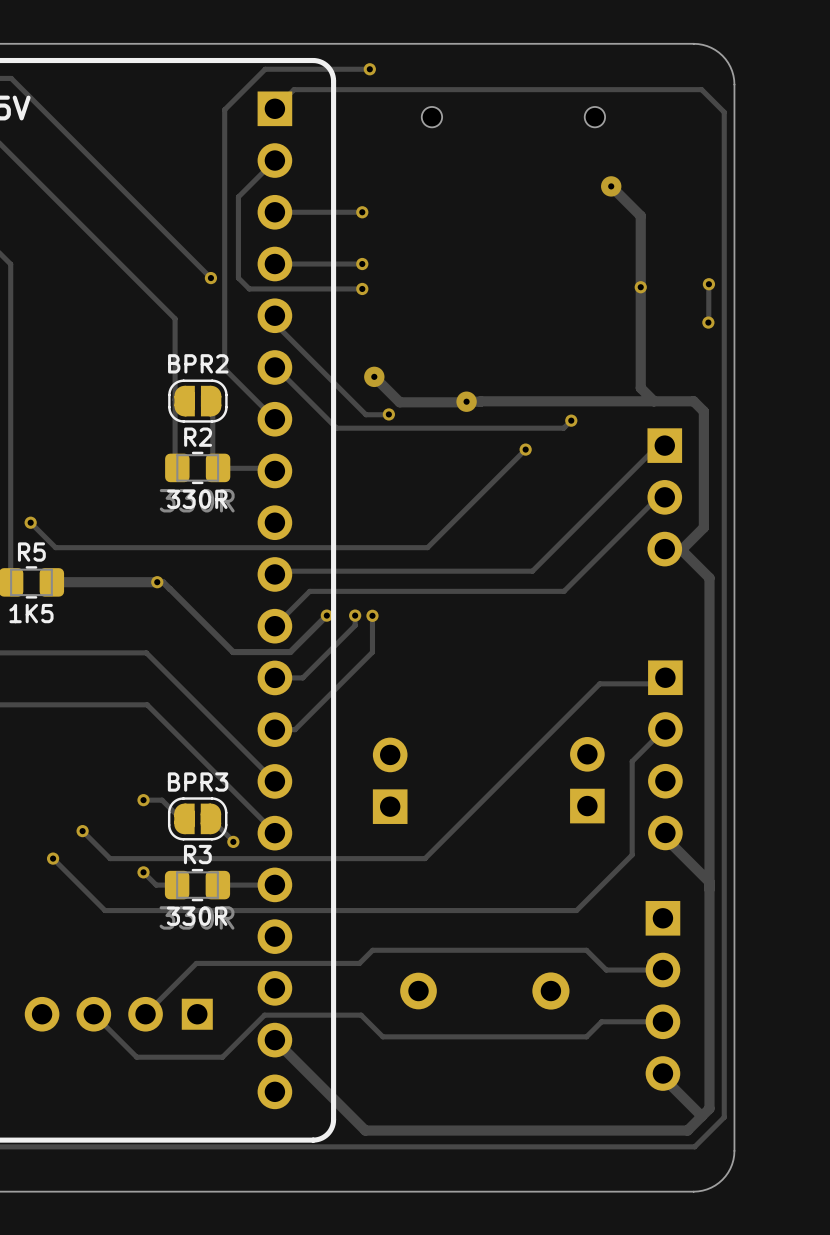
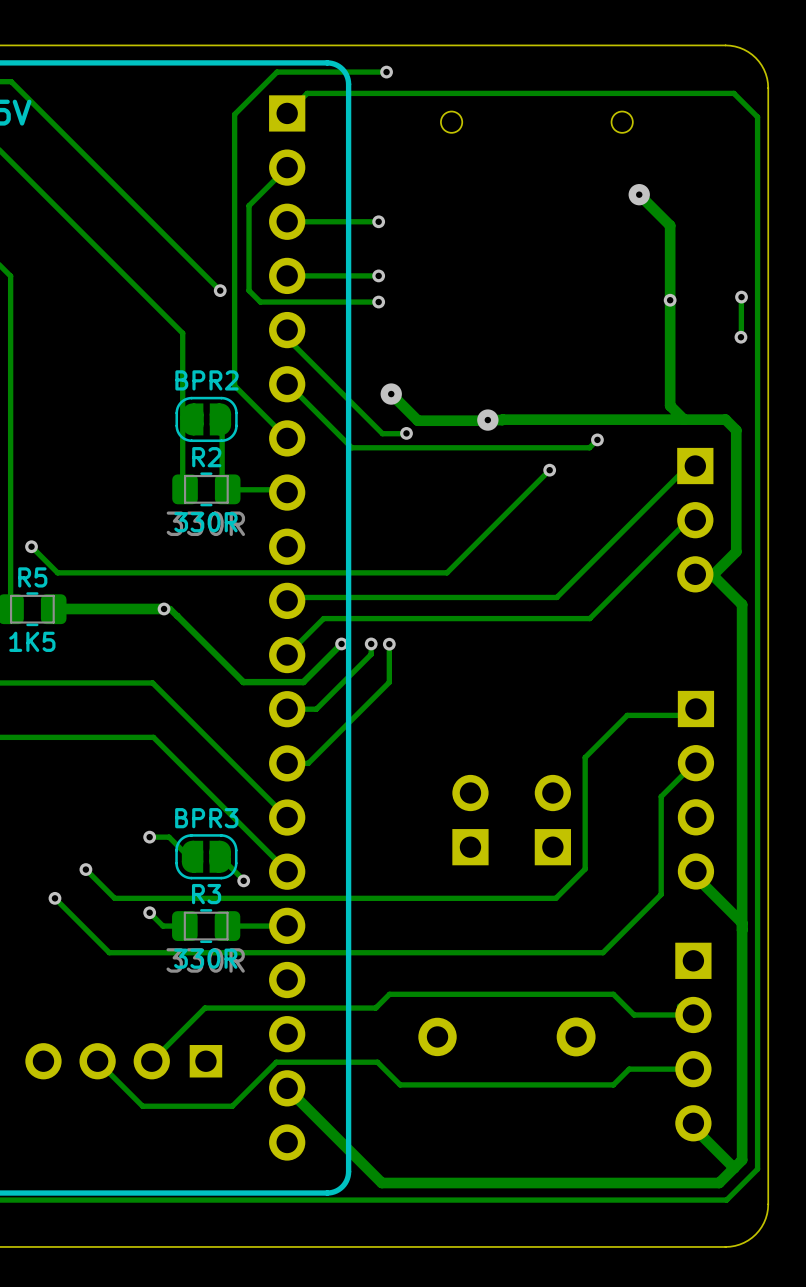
track: (559, 724) (425, 858) -> (585, 757) (585, 869) (555, 898) (444, 898)
part position: (390, 780) -> (470, 820)
part position: (587, 780) -> (552, 820)

